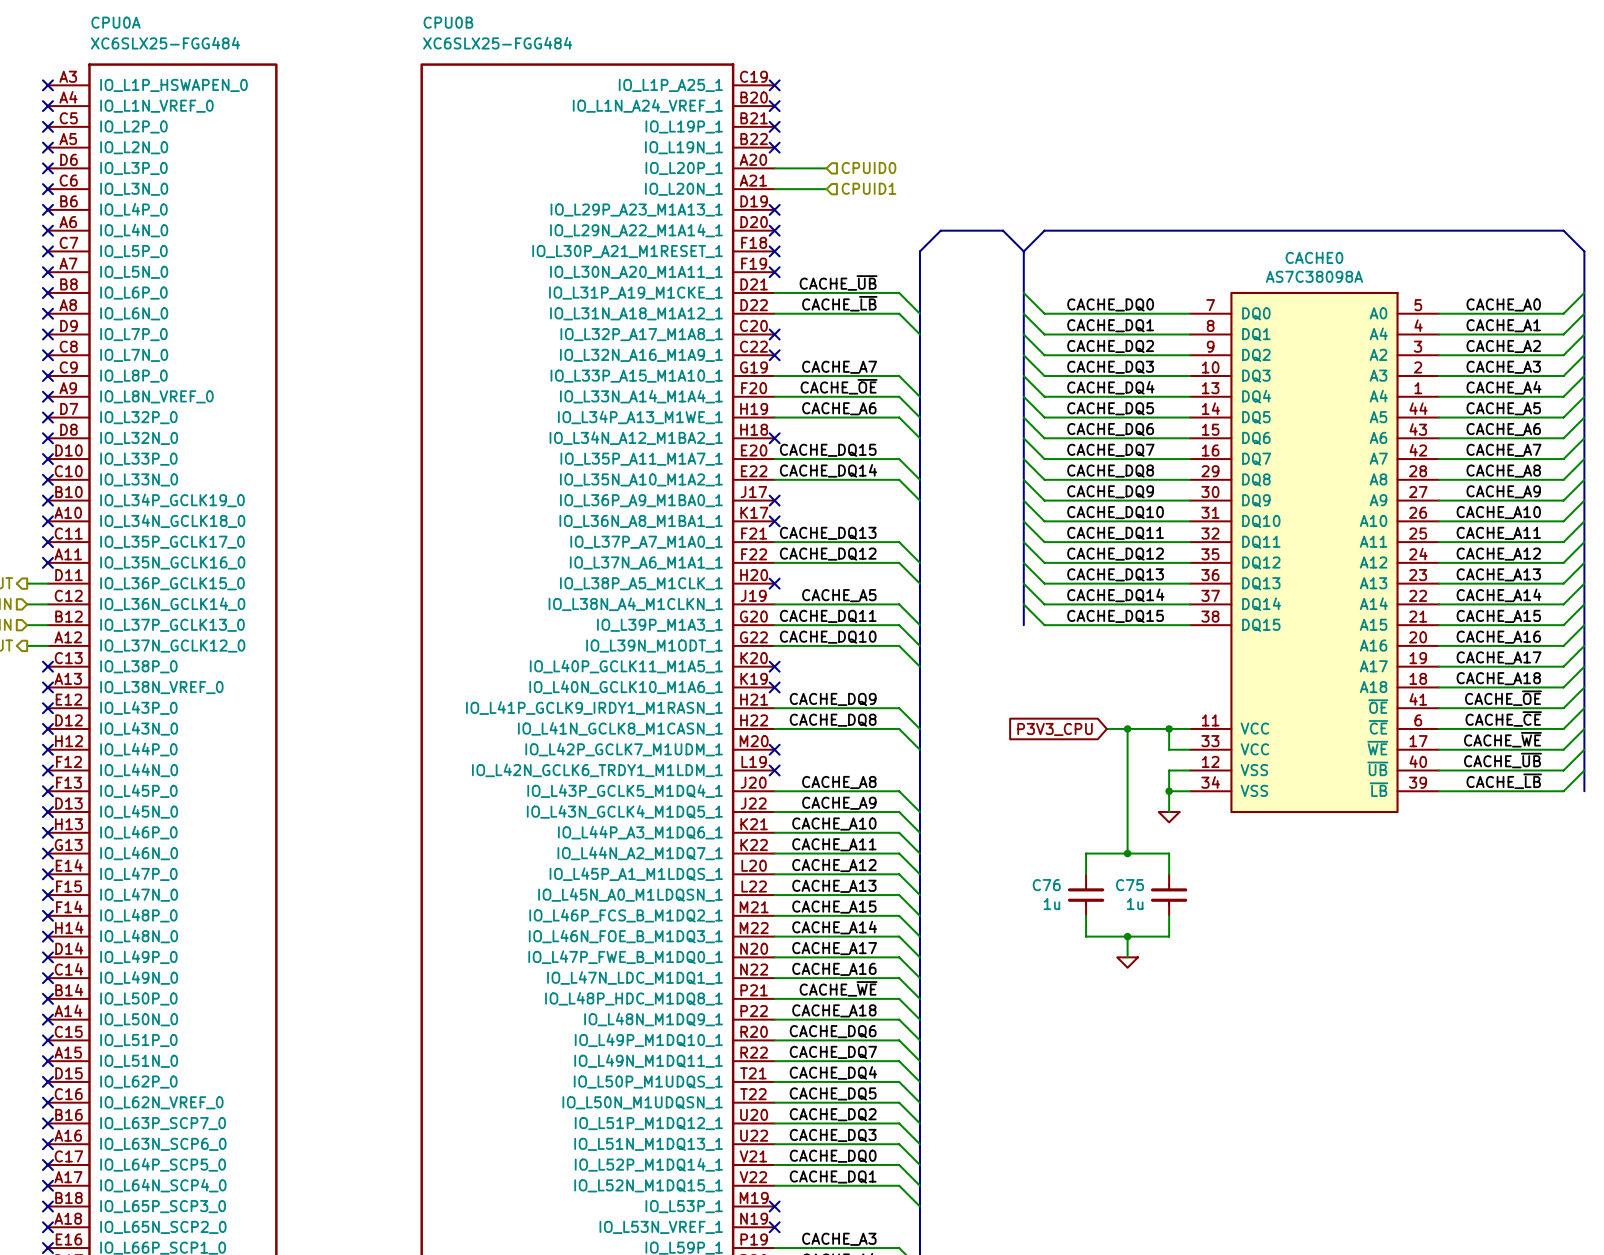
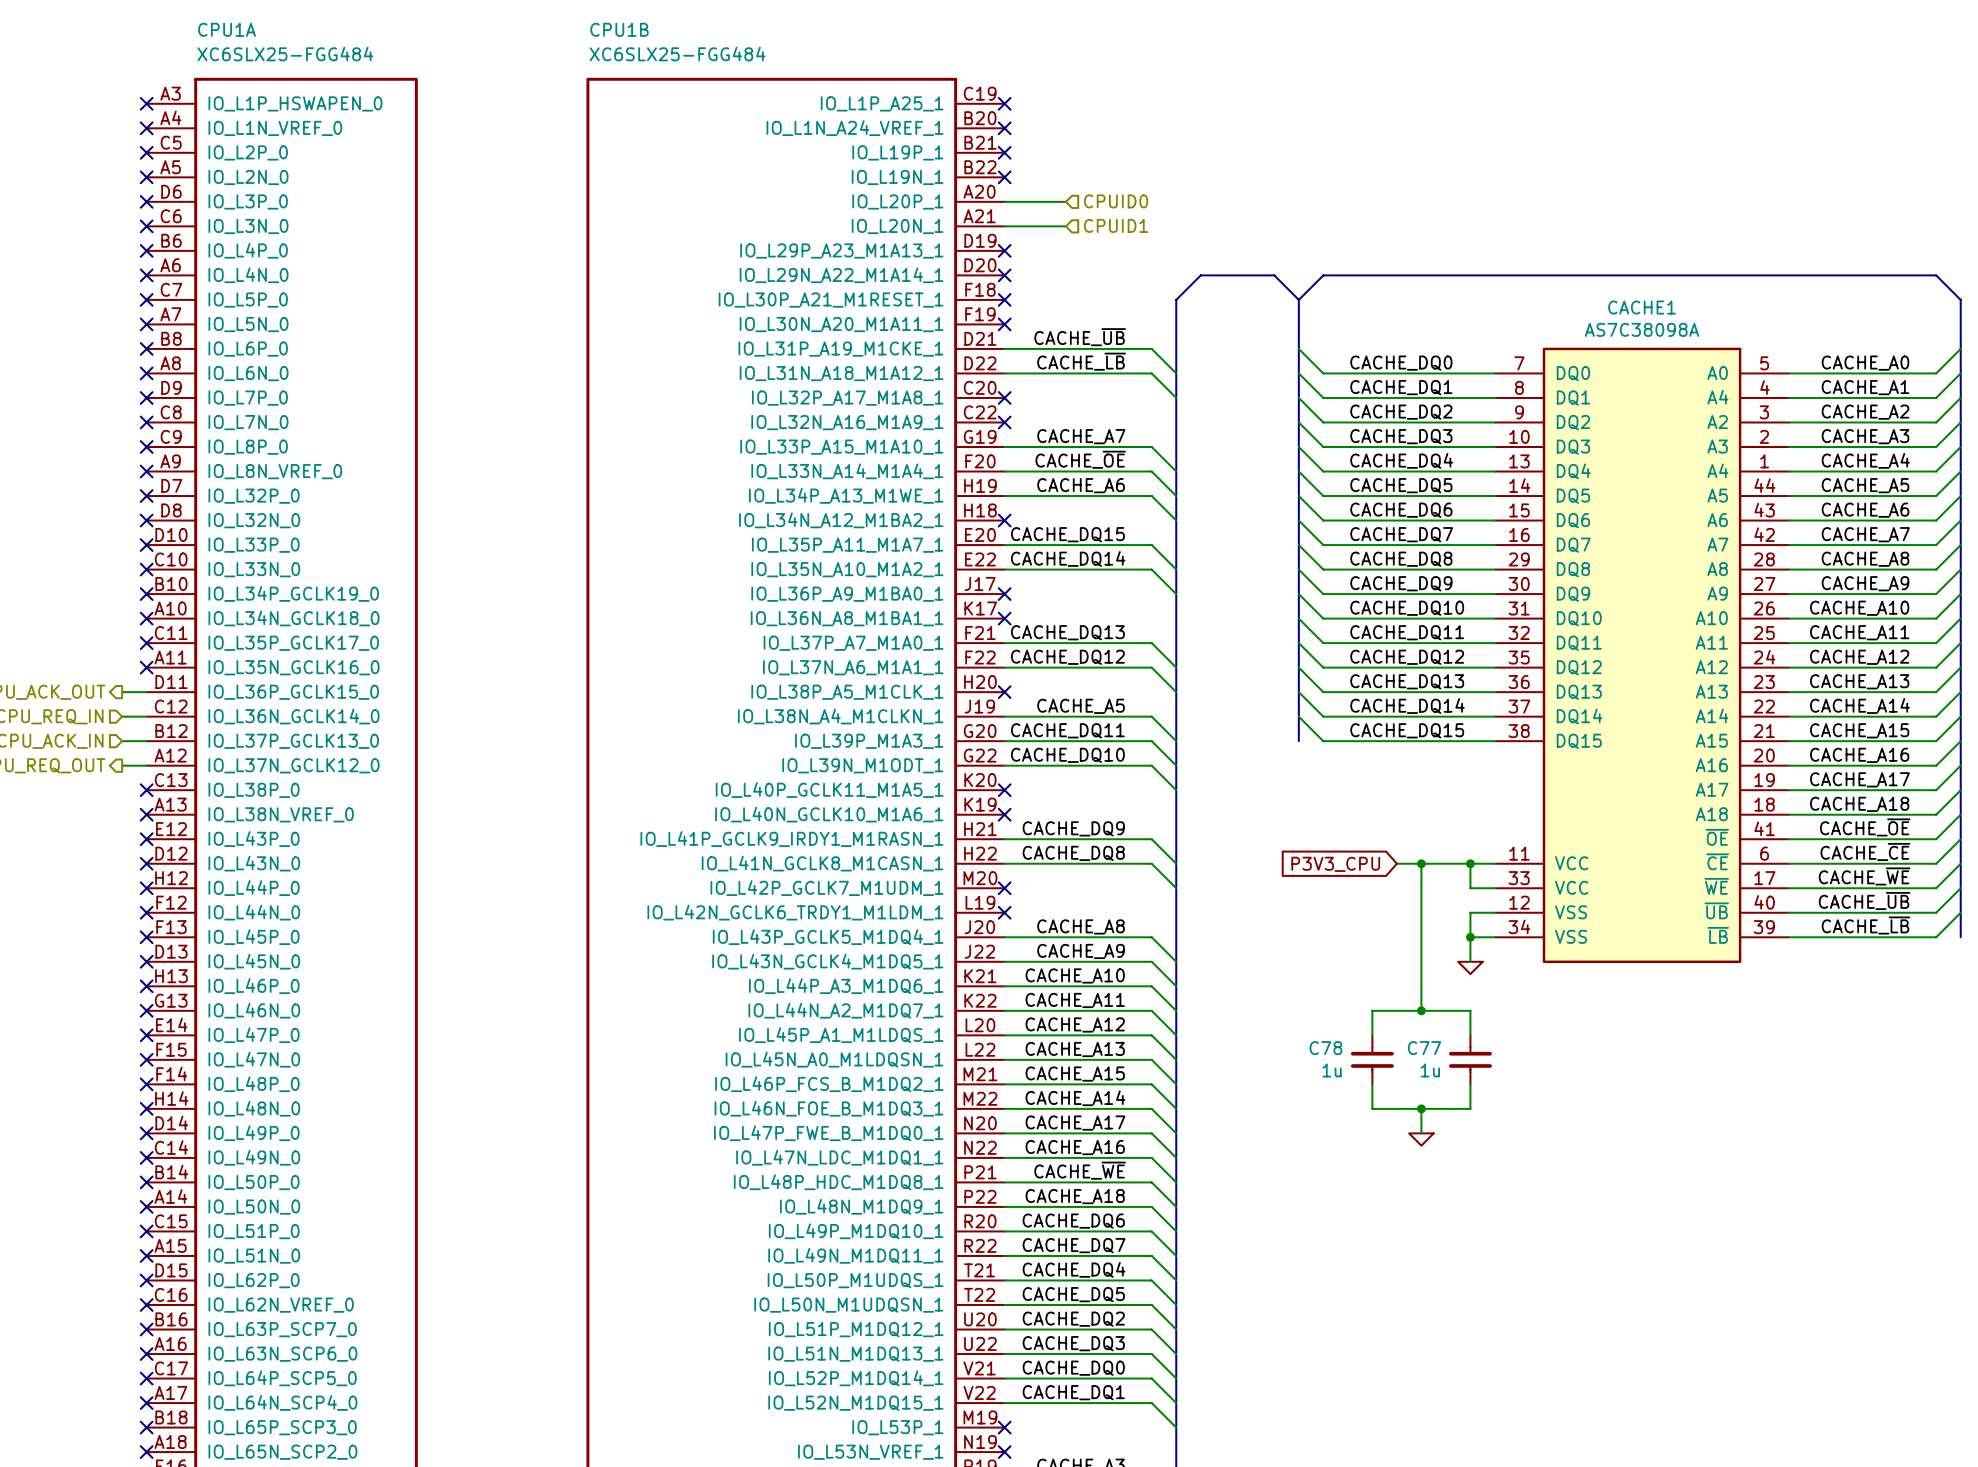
CPU0A name: CPU0A (116, 22) -> CPU1A (227, 29)
CPU0B name: CPU0B (448, 22) -> CPU1B (619, 29)
CACHE0 name: CACHE0 (1314, 257) -> CACHE1 (1642, 307)
C76 name: C76 (1046, 885) -> C78 (1325, 1048)
C75 name: C75 (1129, 885) -> C77 (1424, 1048)

